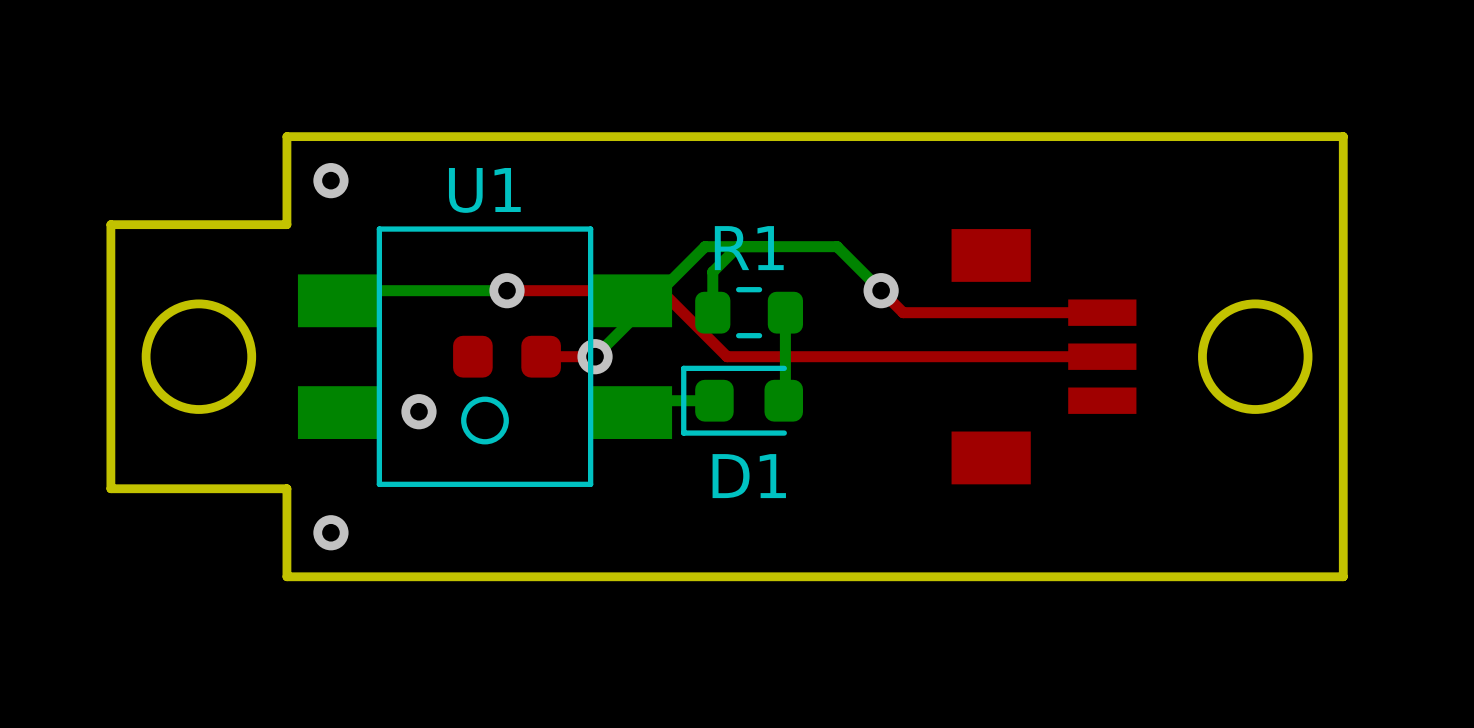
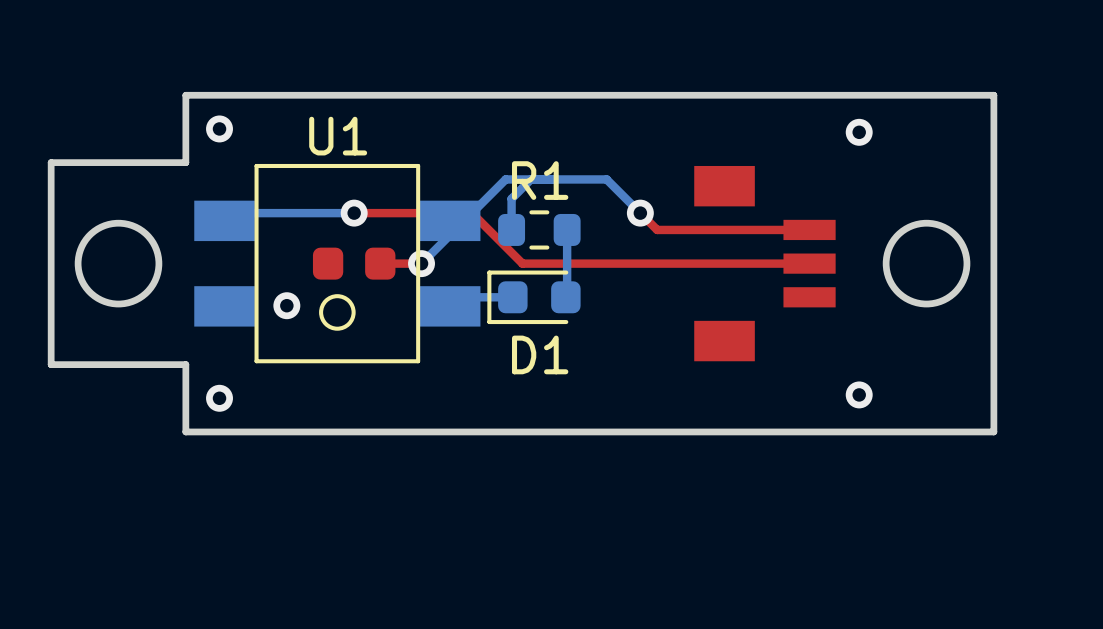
via: none -> (859, 132)
via: none -> (859, 394)

